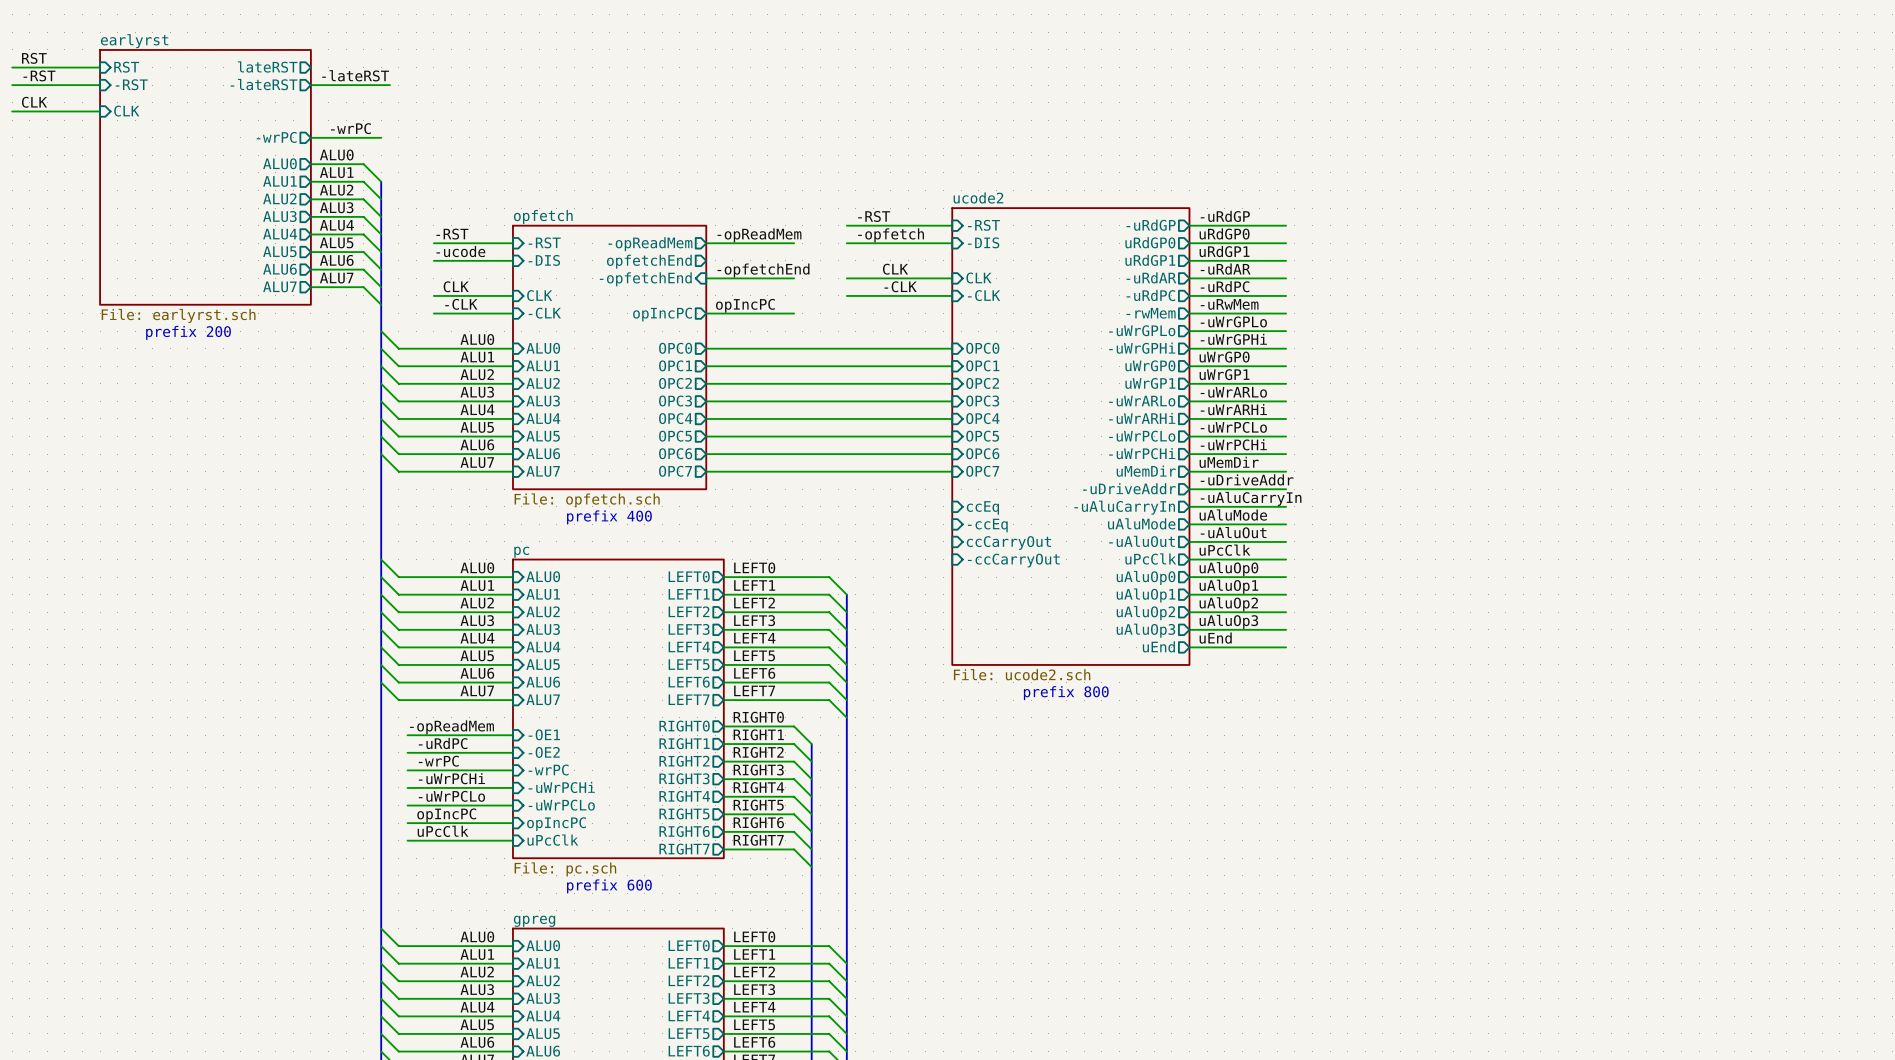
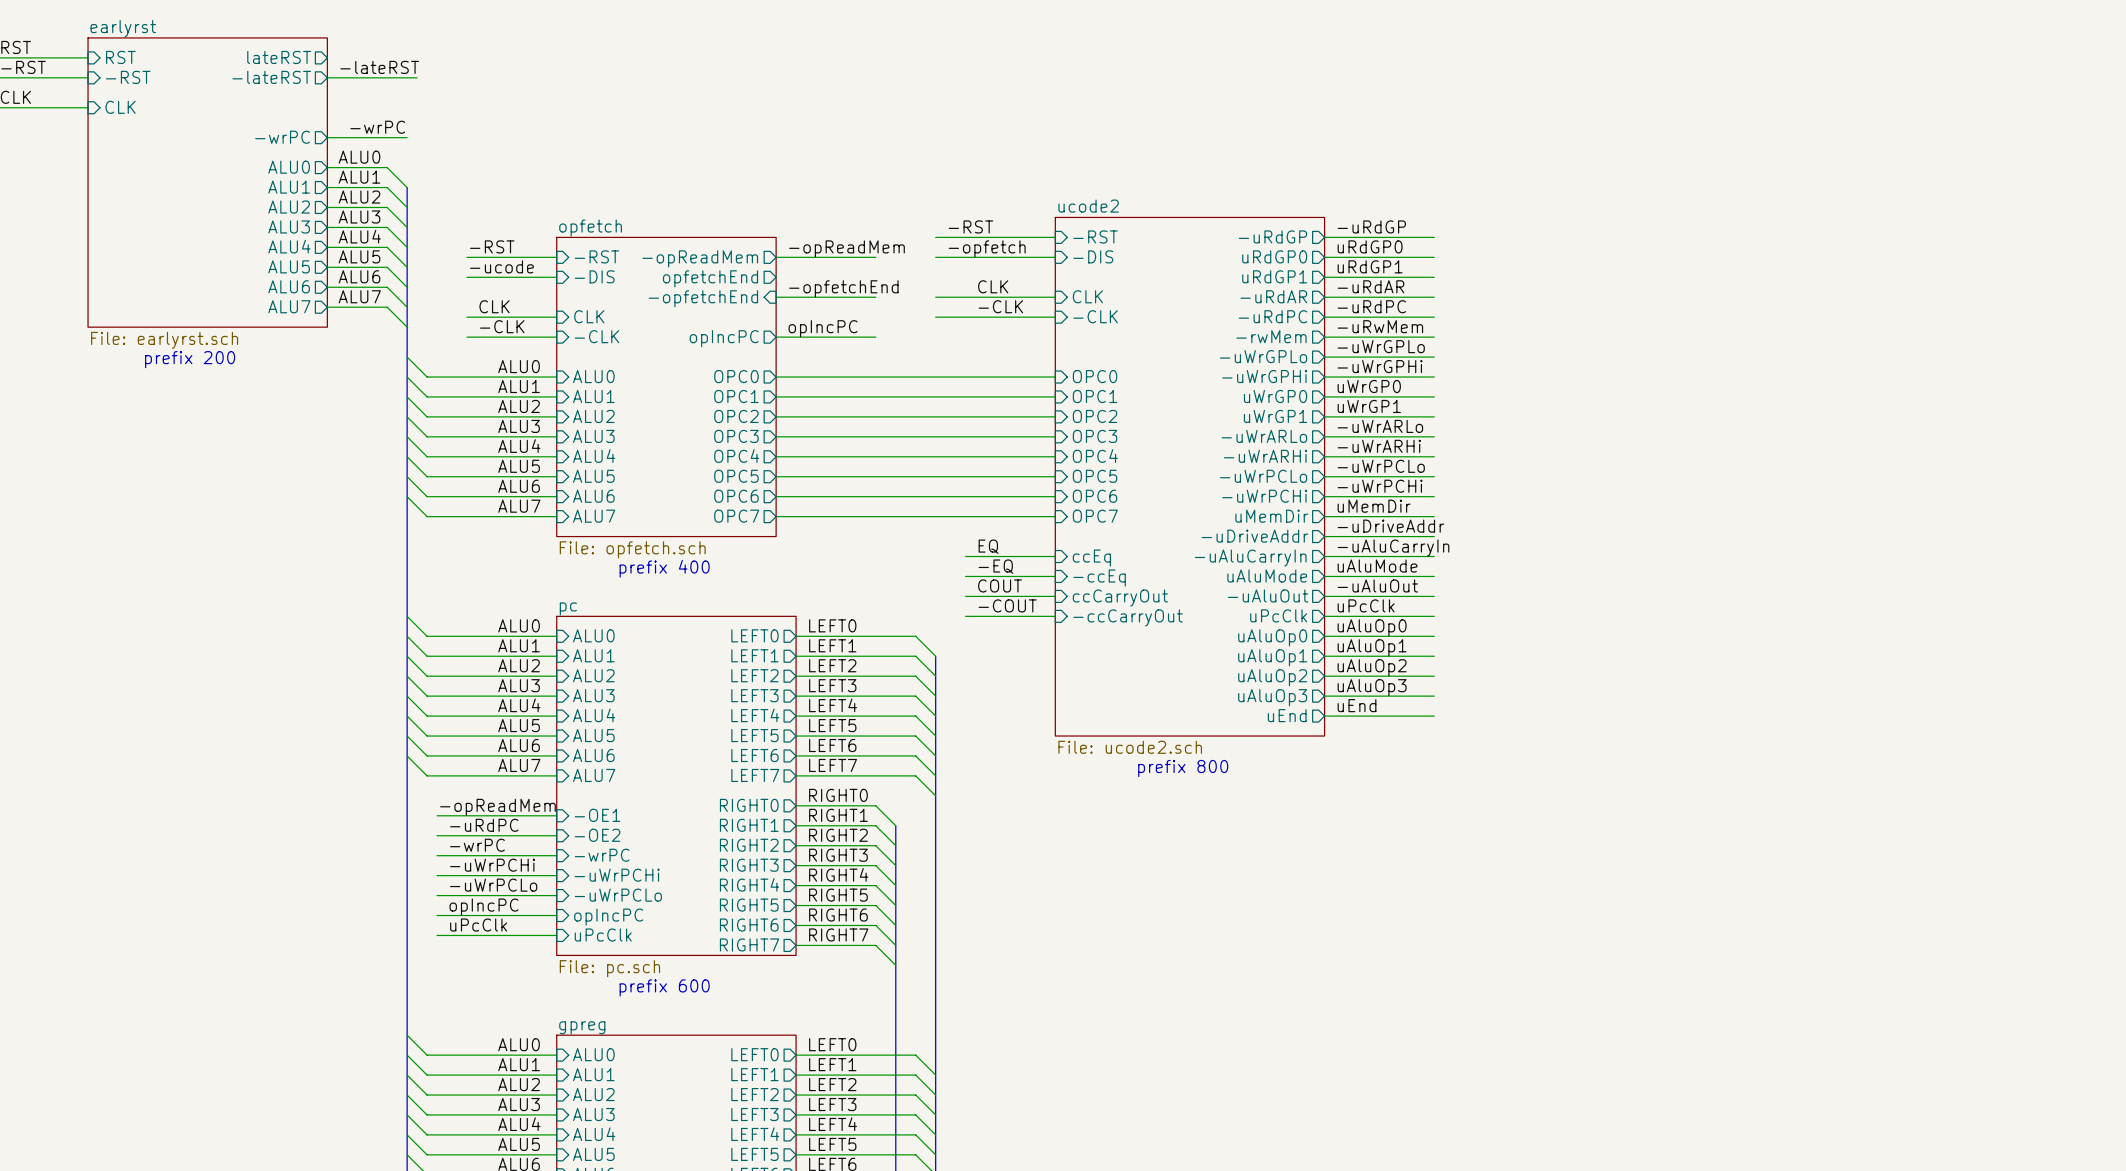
label: none -> EQ (988, 546)
wire: none -> (965, 556) (1055, 556)
label: none -> -EQ (996, 566)
wire: none -> (965, 576) (1055, 576)
label: none -> COUT (1000, 585)
wire: none -> (965, 596) (1055, 596)
label: none -> -COUT (1007, 605)
wire: none -> (965, 616) (1055, 616)

